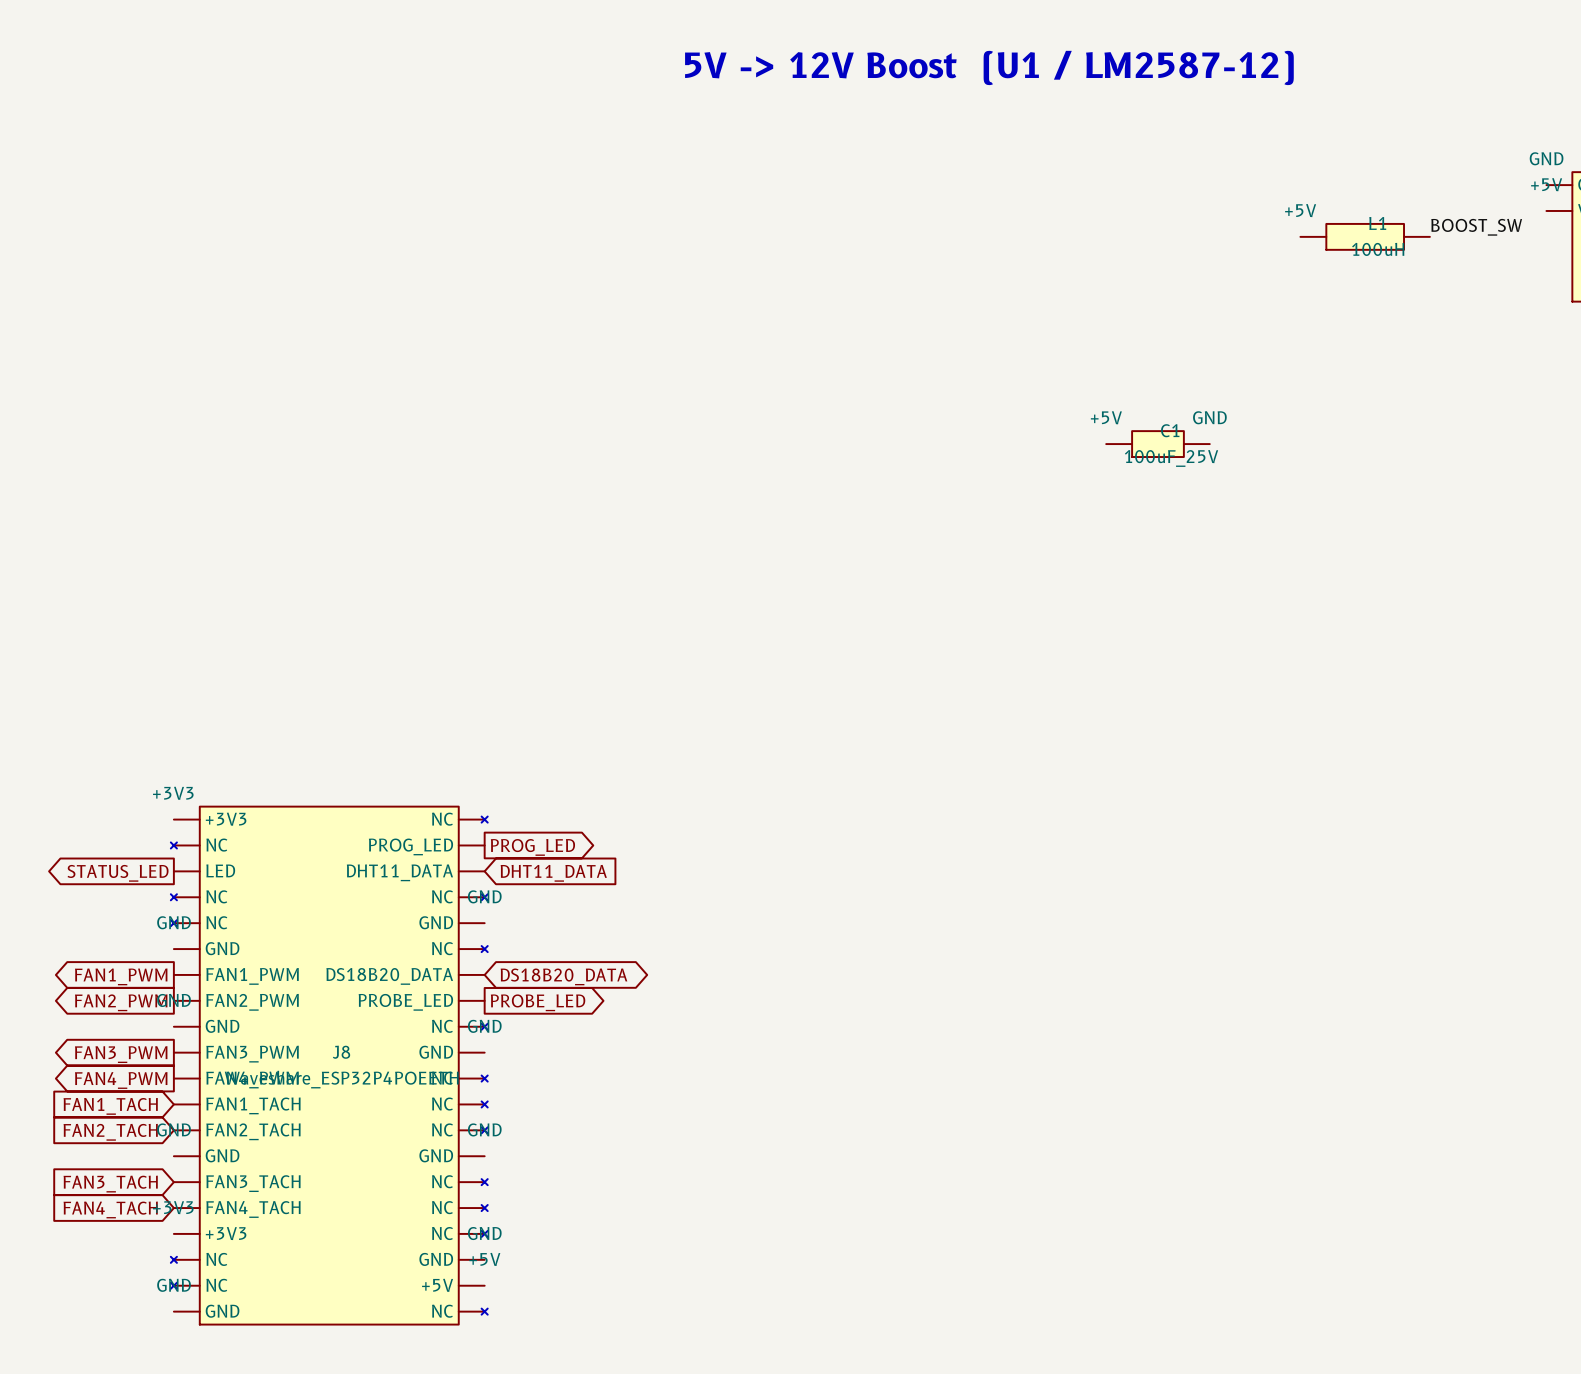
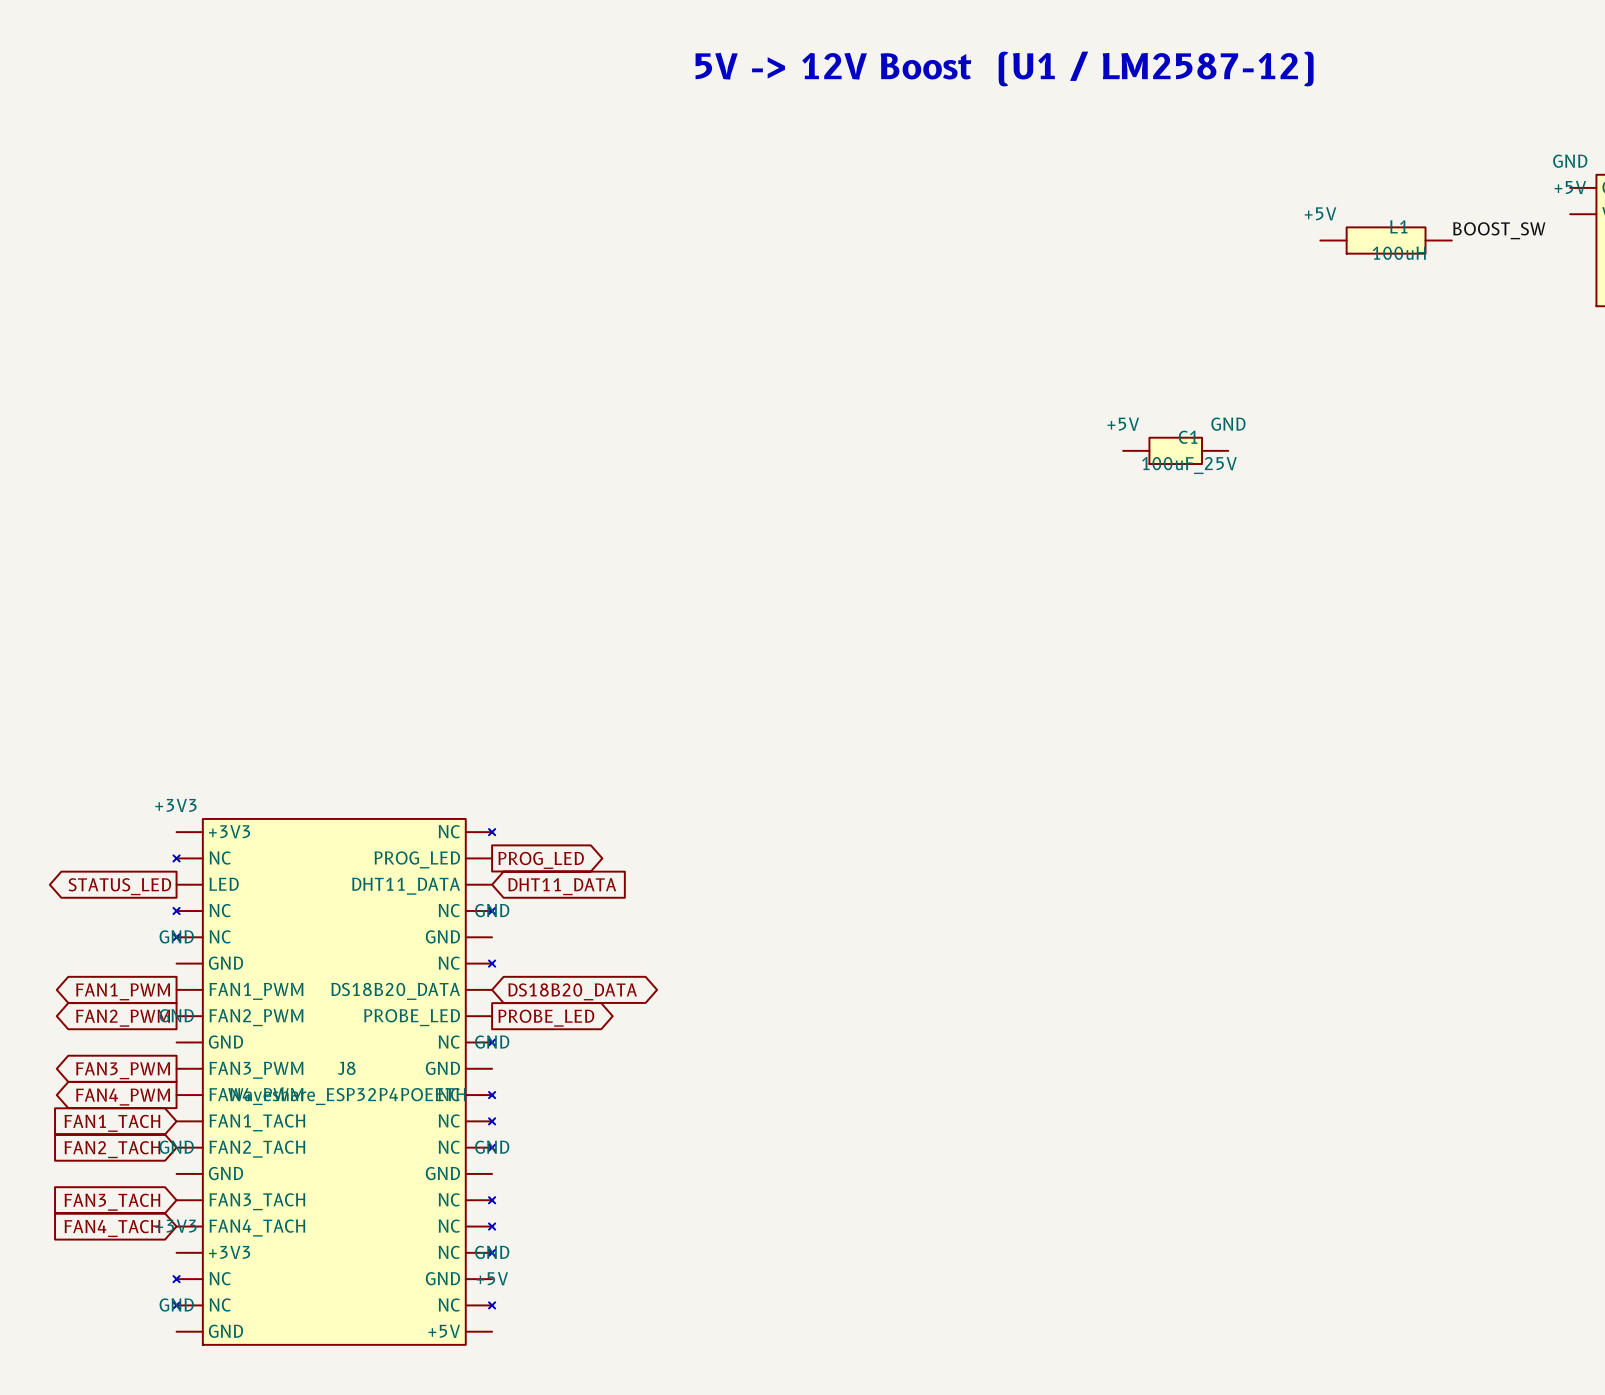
J8 symbol: [170, 806, 488, 1325] -> [173, 818, 496, 1345]

